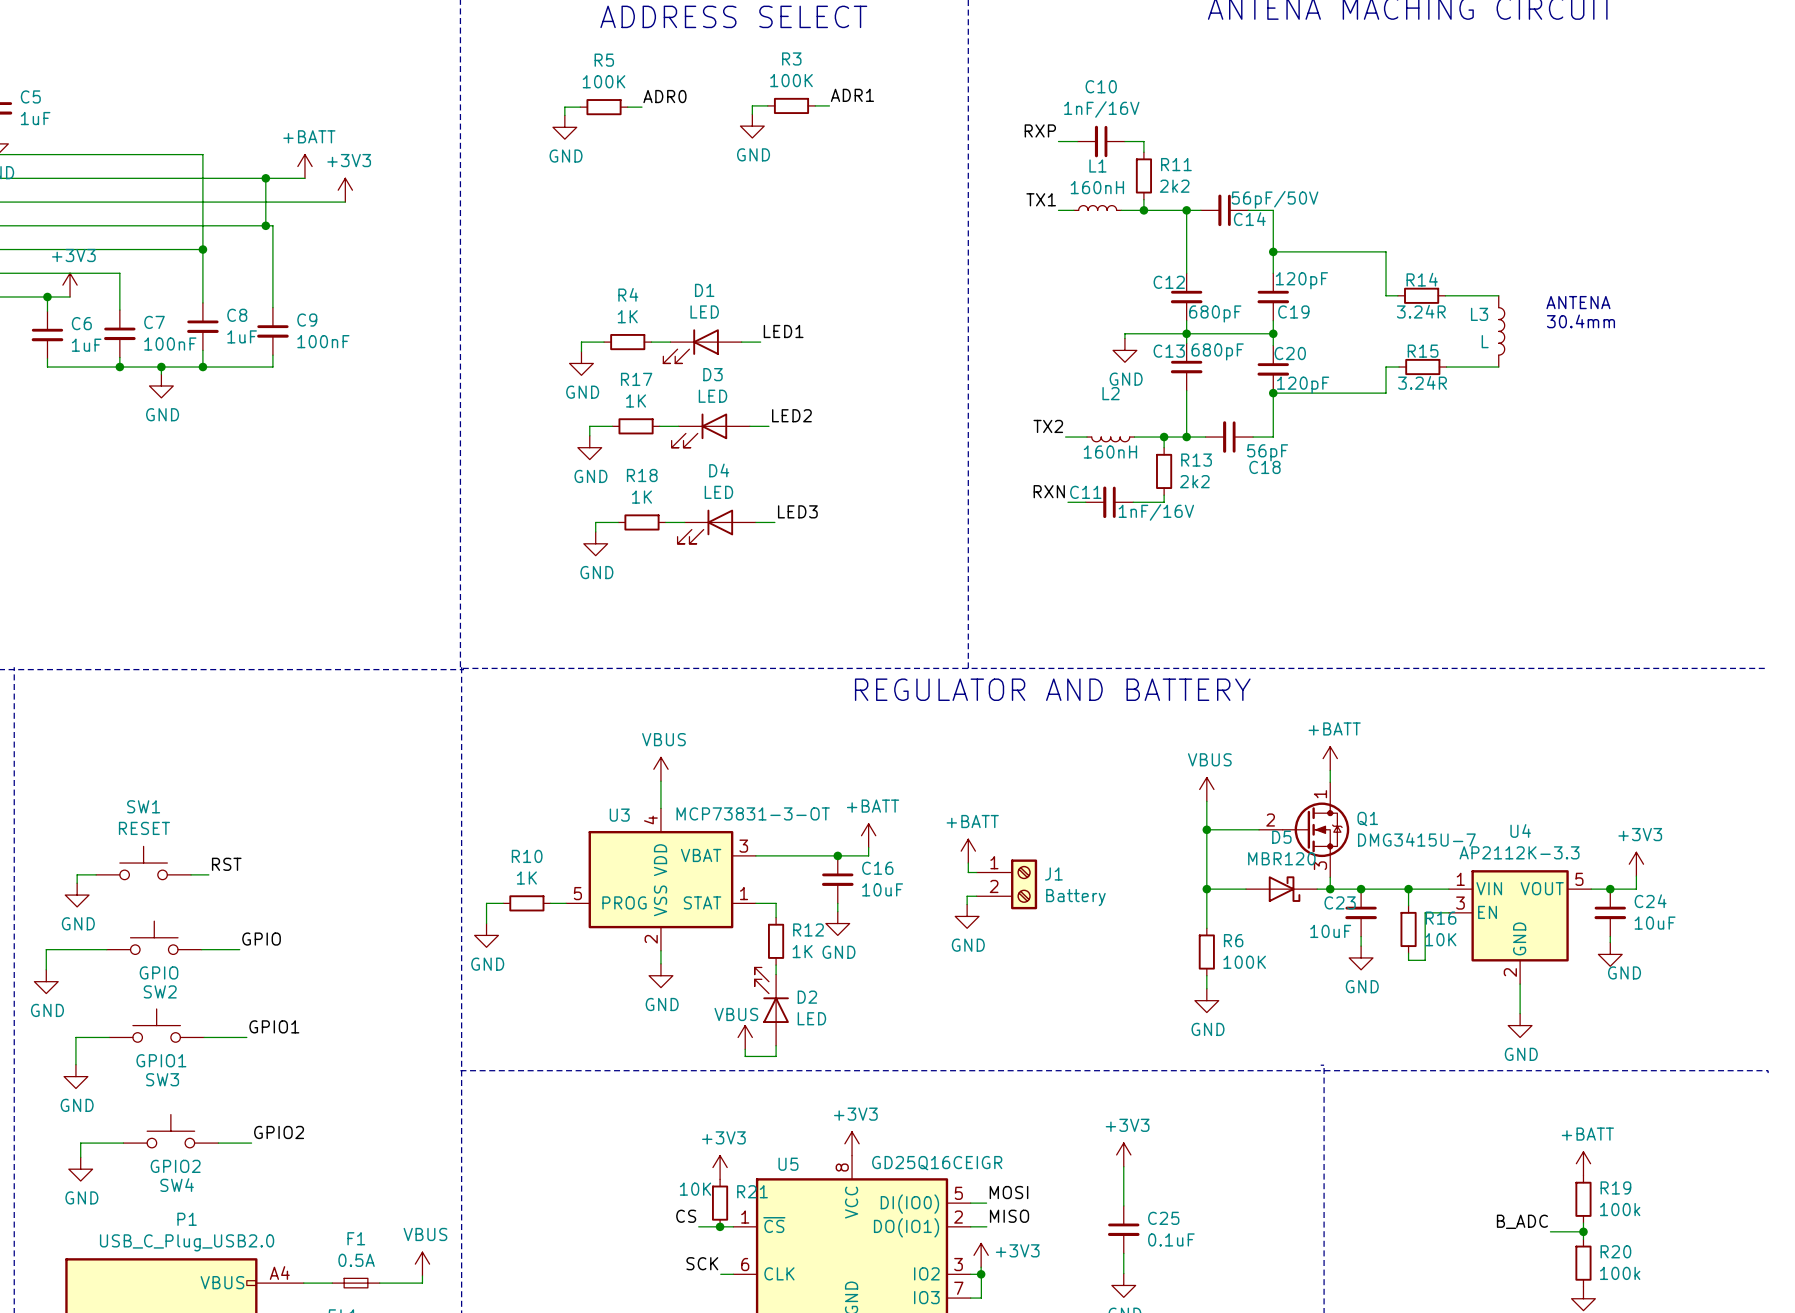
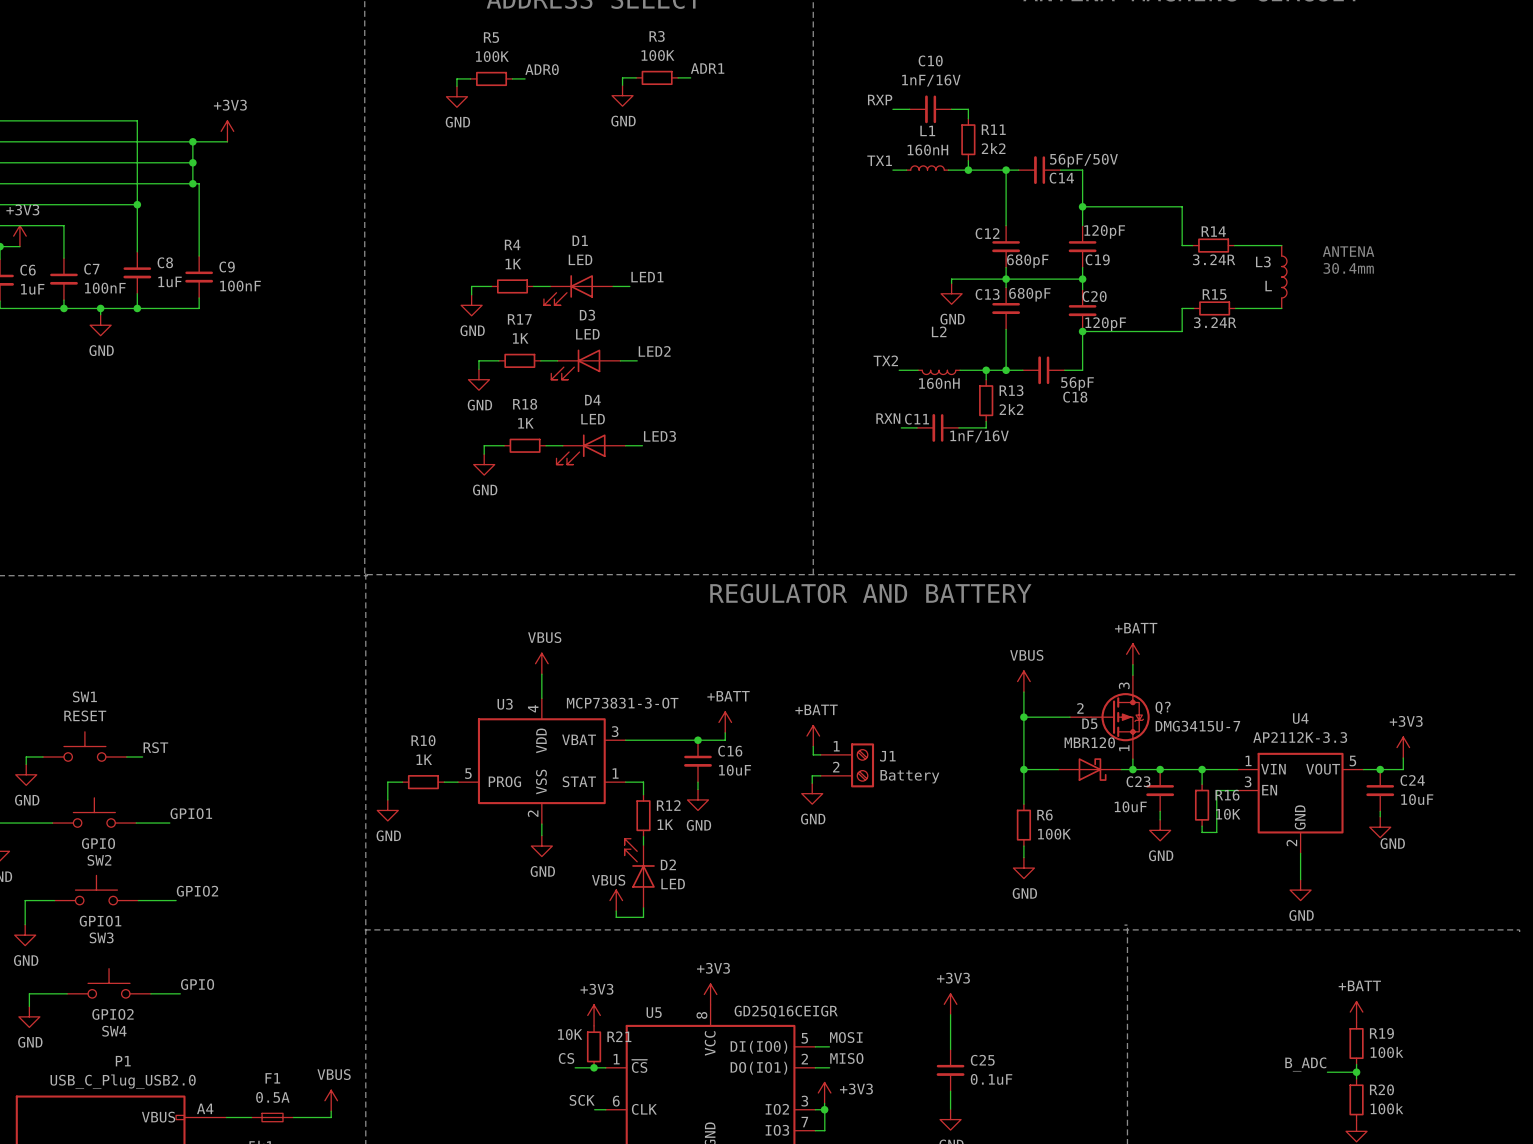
power symbol: +BATT (304, 166) -> +3V3 (227, 131)
power symbol: +3V3 (345, 190) -> none
wire: (265, 202) (345, 202) -> none
junction: none -> (192, 162)
Q1: DMG3415U-7 (1304, 829) -> none
Q?: none -> DMG3415U-7 (1109, 717)
label: GPIO (261, 939) -> GPIO1 (191, 813)
label: GPIO1 (274, 1026) -> GPIO2 (197, 891)
label: GPIO2 (279, 1132) -> GPIO (197, 984)

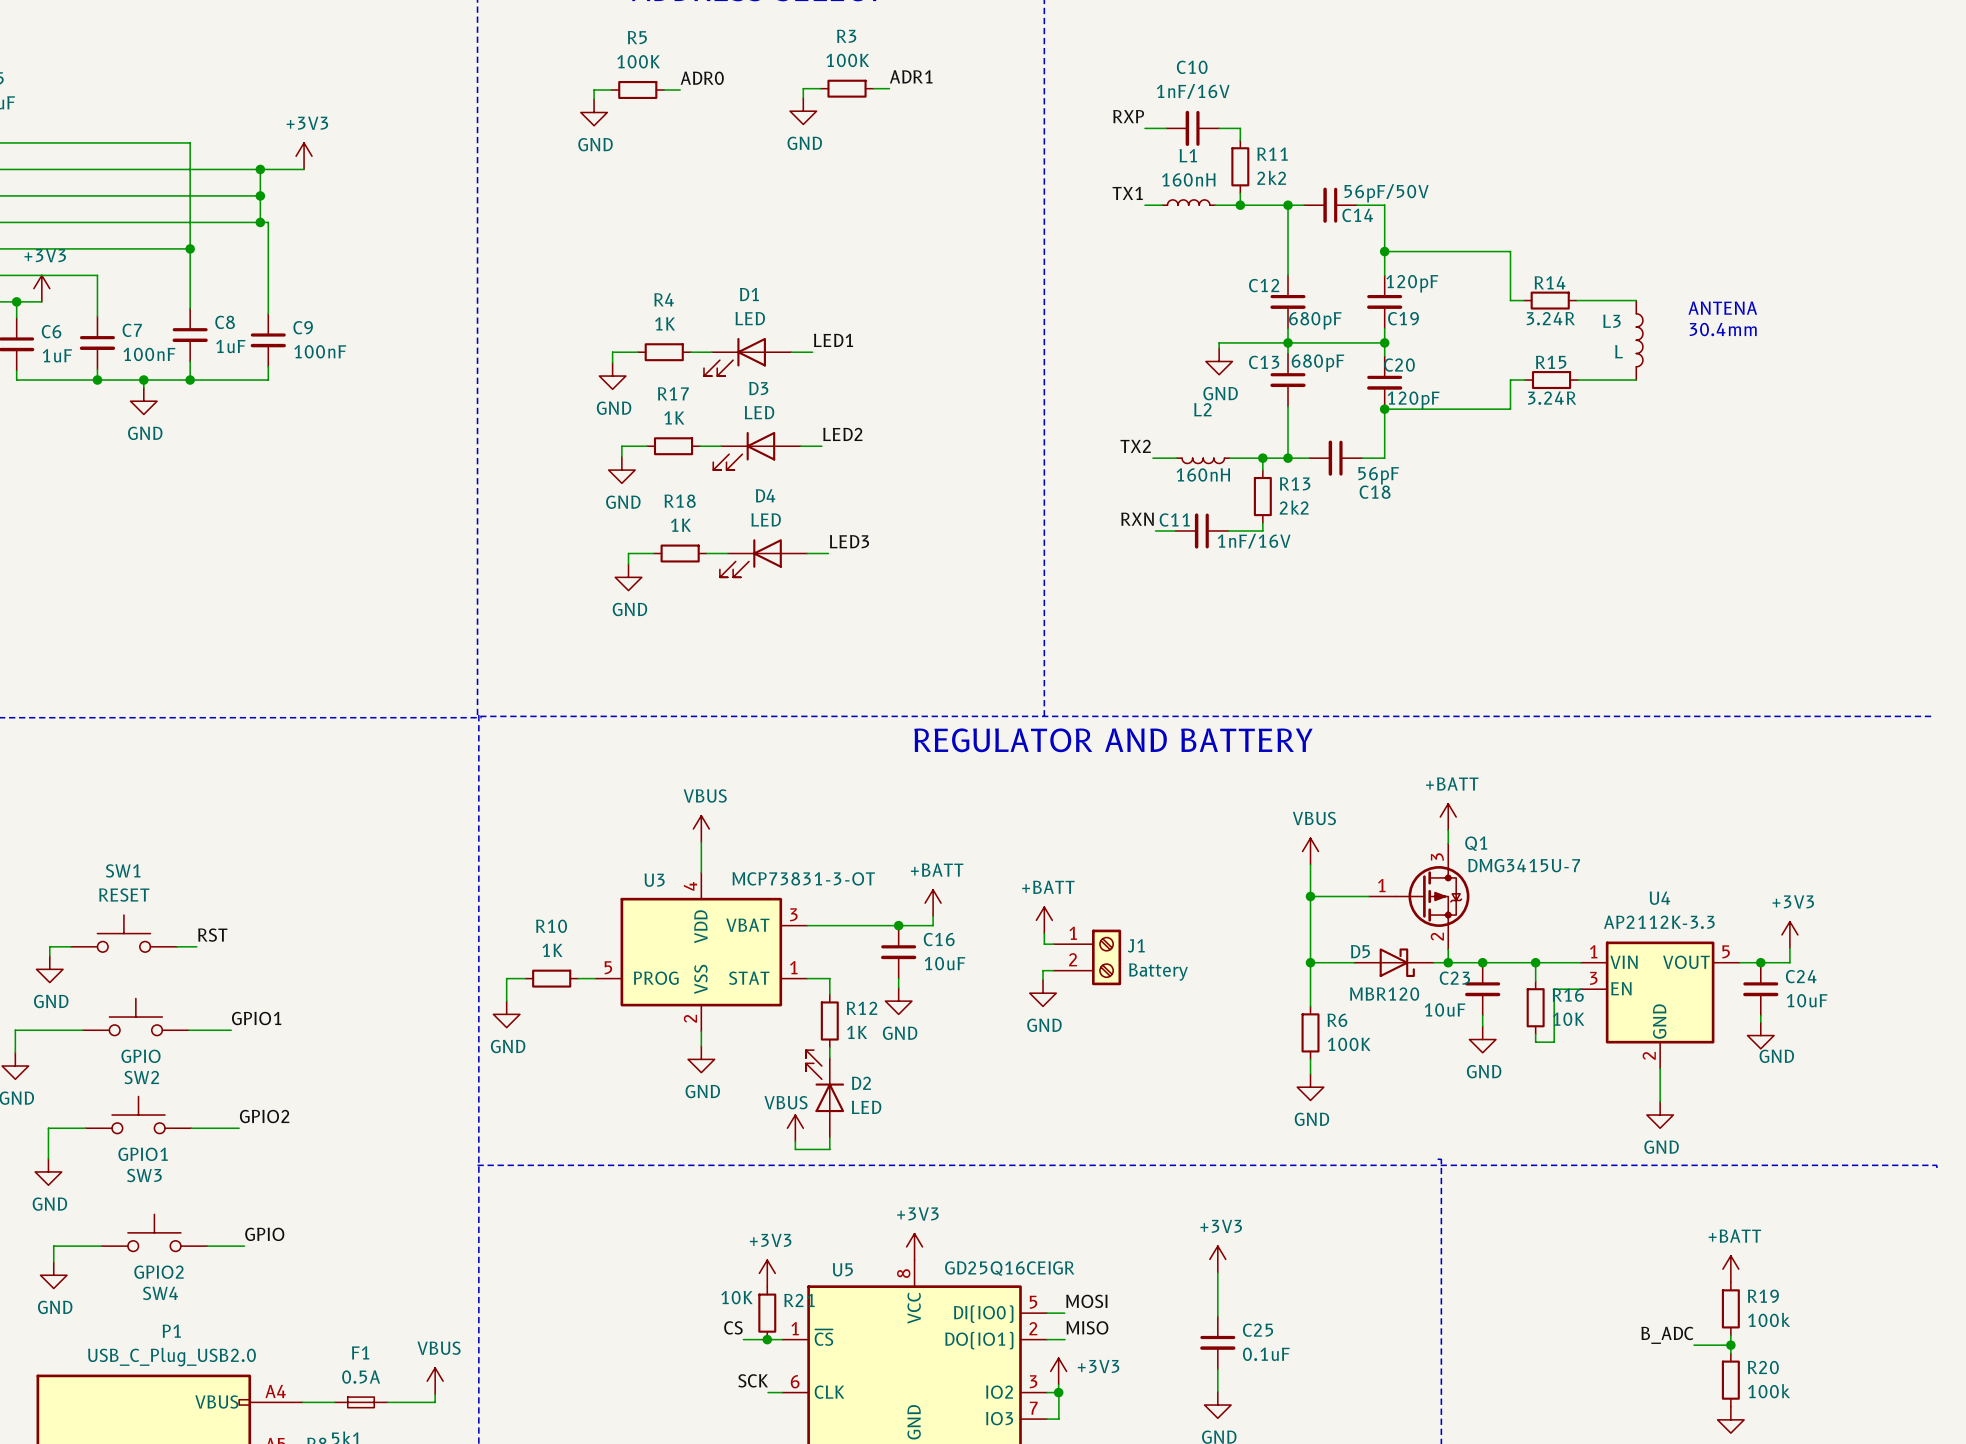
Q? name: Q? (1163, 707) -> Q1 (1476, 843)
Q? pin number: 2 (1080, 708) -> 1 (1381, 885)
D5 name position: D5 (1089, 723) -> D5 (1360, 951)
Q? value position: DMG3415U-7 (1197, 726) -> DMG3415U-7 (1524, 865)
D5 value position: MBR120 (1089, 742) -> MBR120 (1384, 994)
Q? pin number: 1 (1124, 748) -> 2 (1437, 936)

